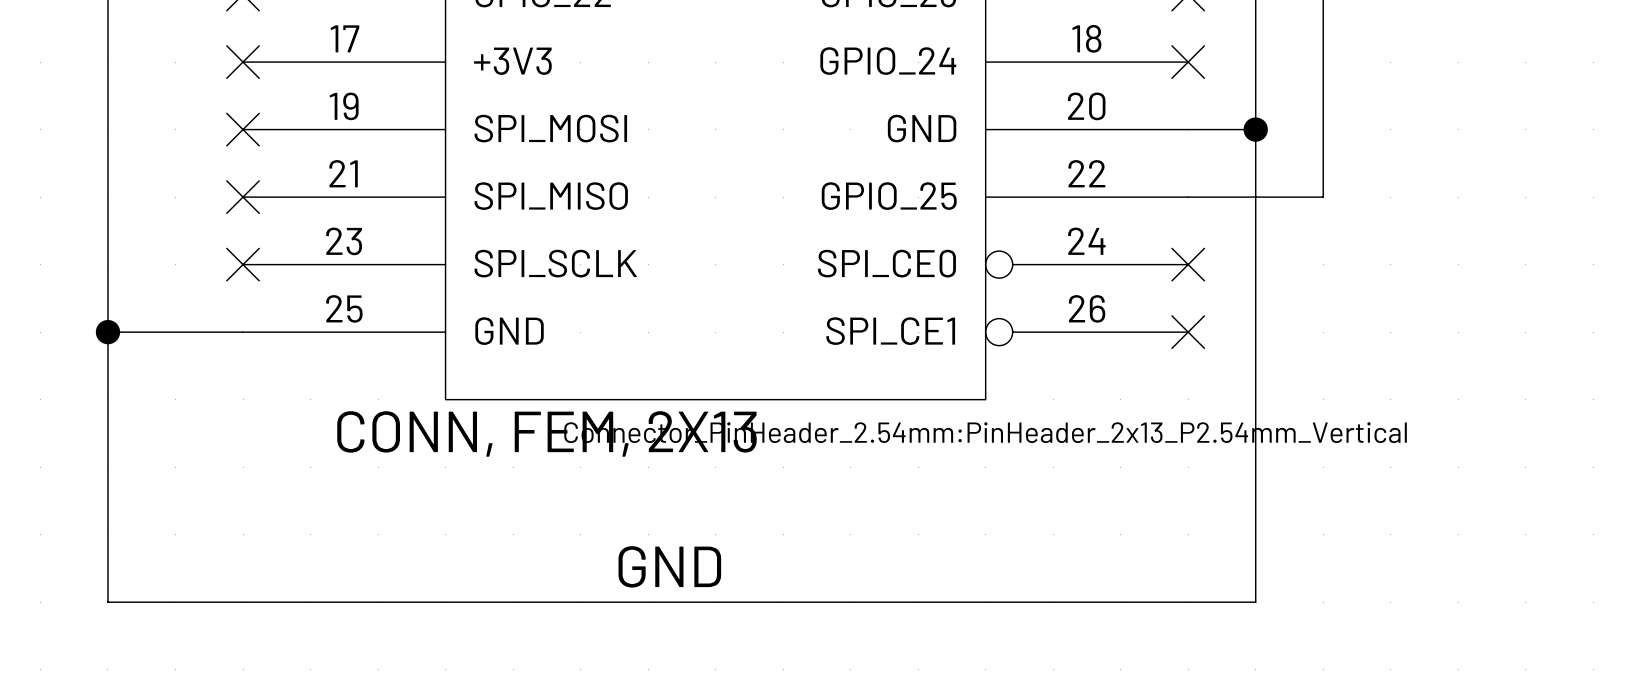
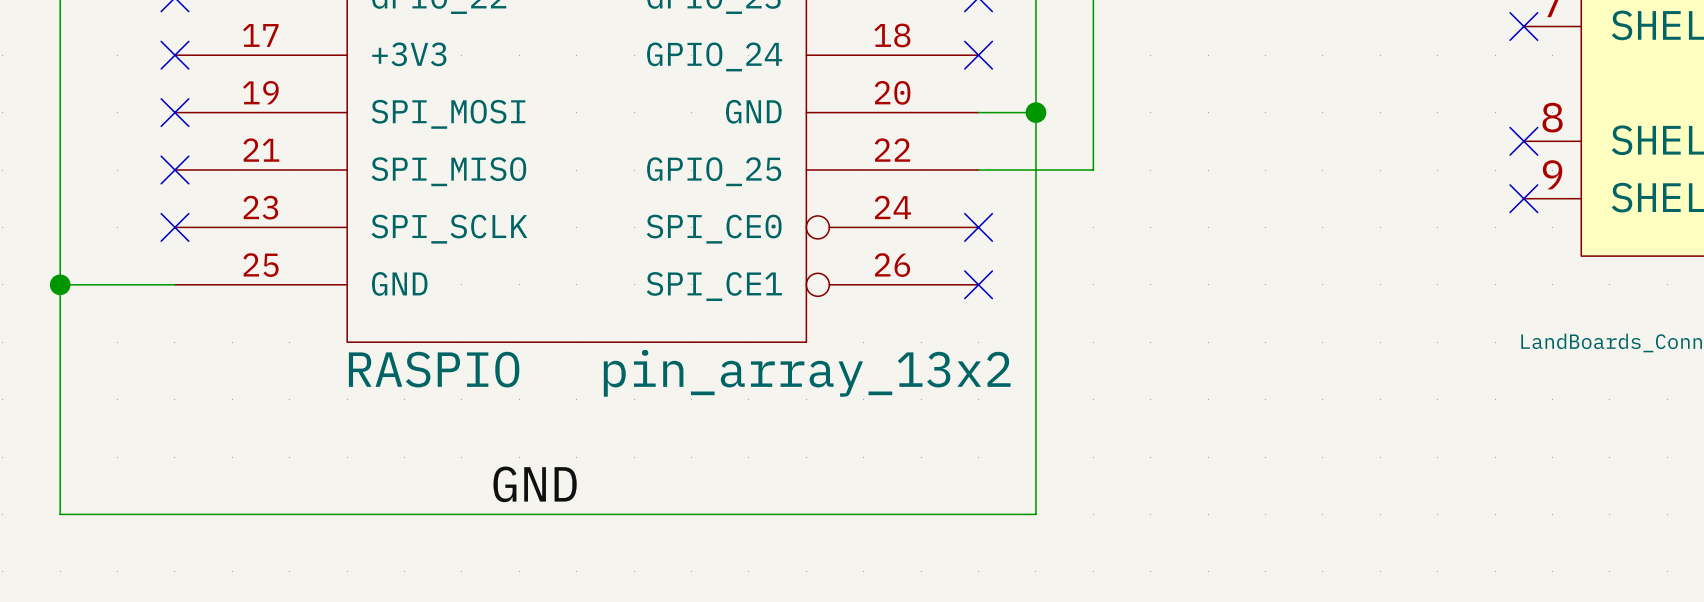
part text: Connector_PinHeader_2.54mm:PinHeader_2x13_P2.54mm_Vertical (985, 432) -> pin_array_13x2 (807, 373)
part value: CONN, FEM, 2X13 (547, 433) -> RASPIO (434, 369)

